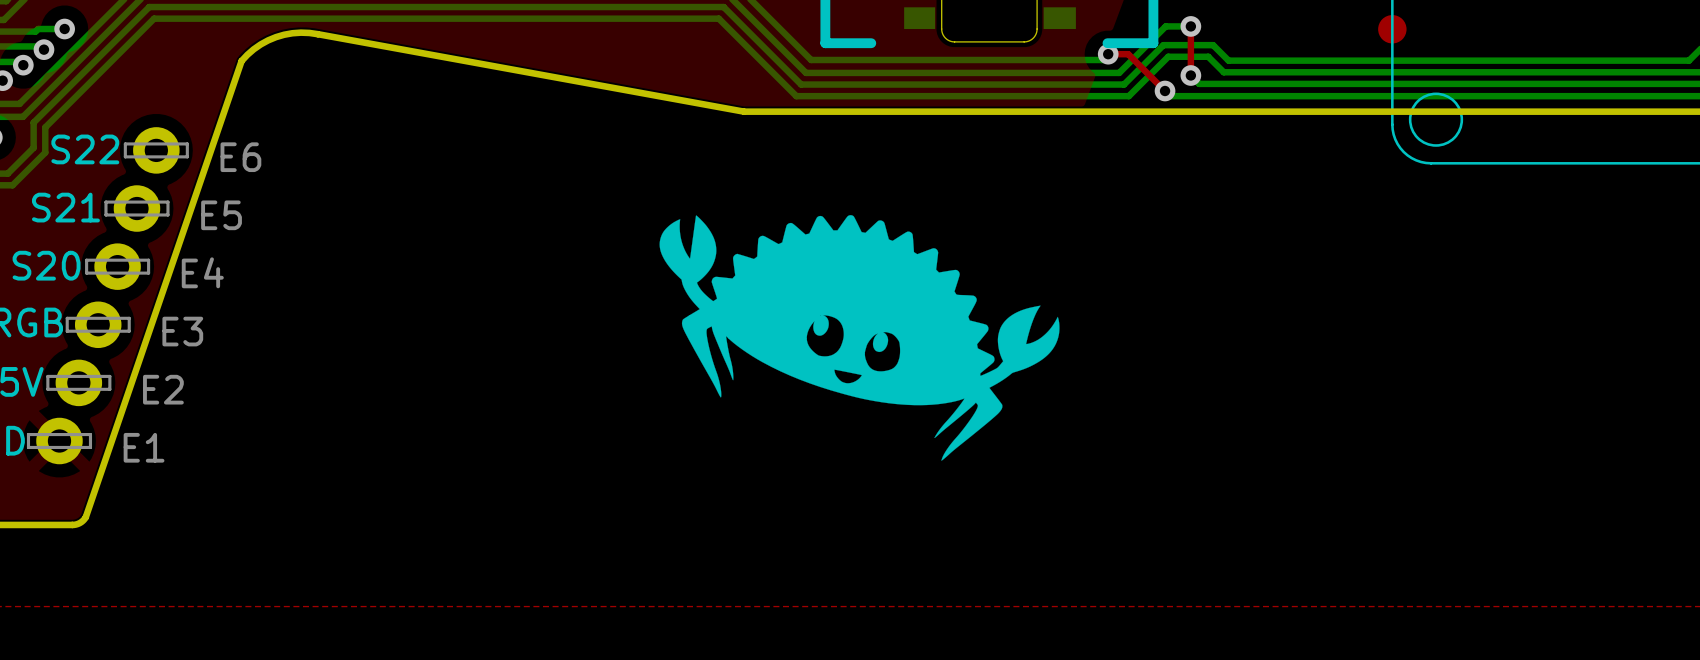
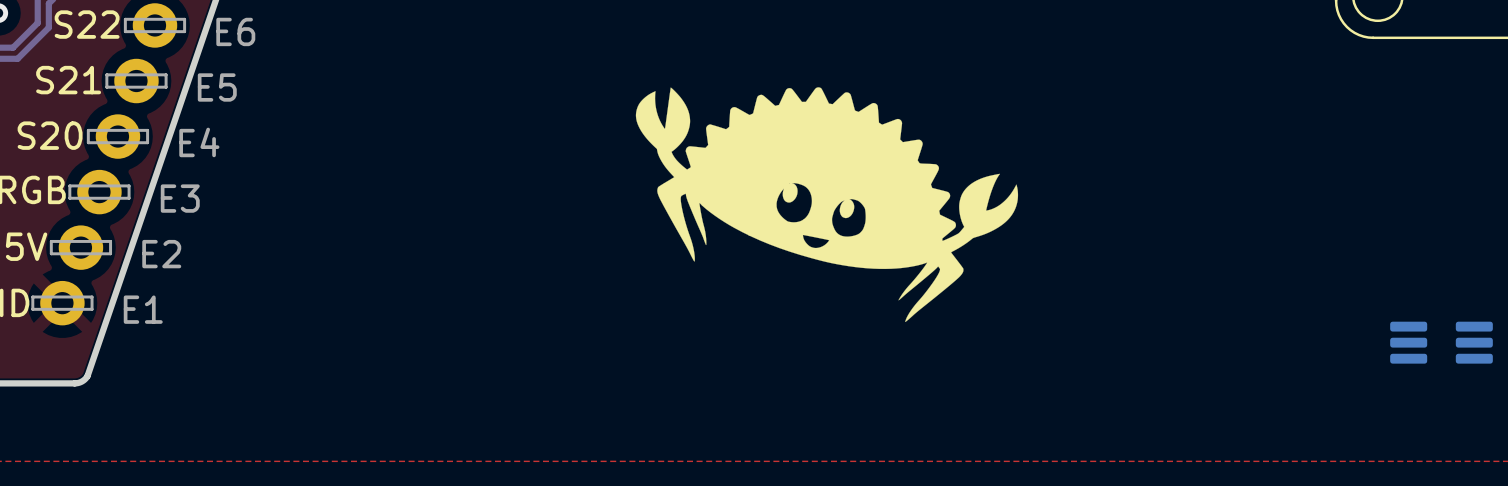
part: none -> (1441, 342)

